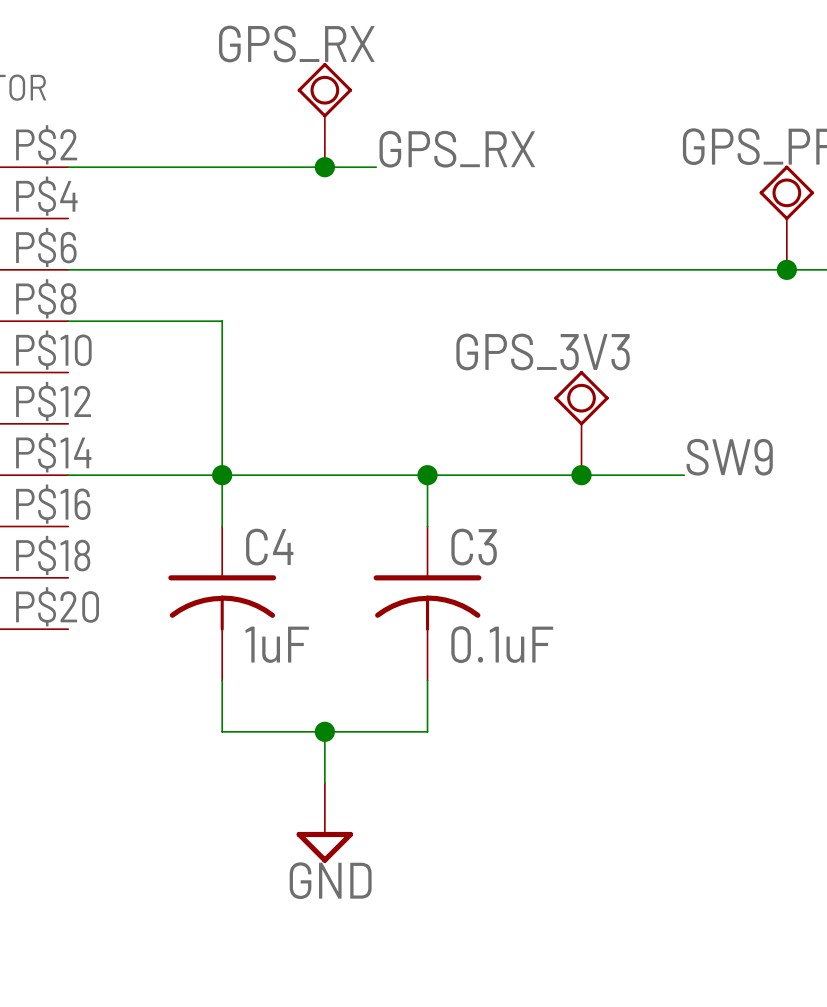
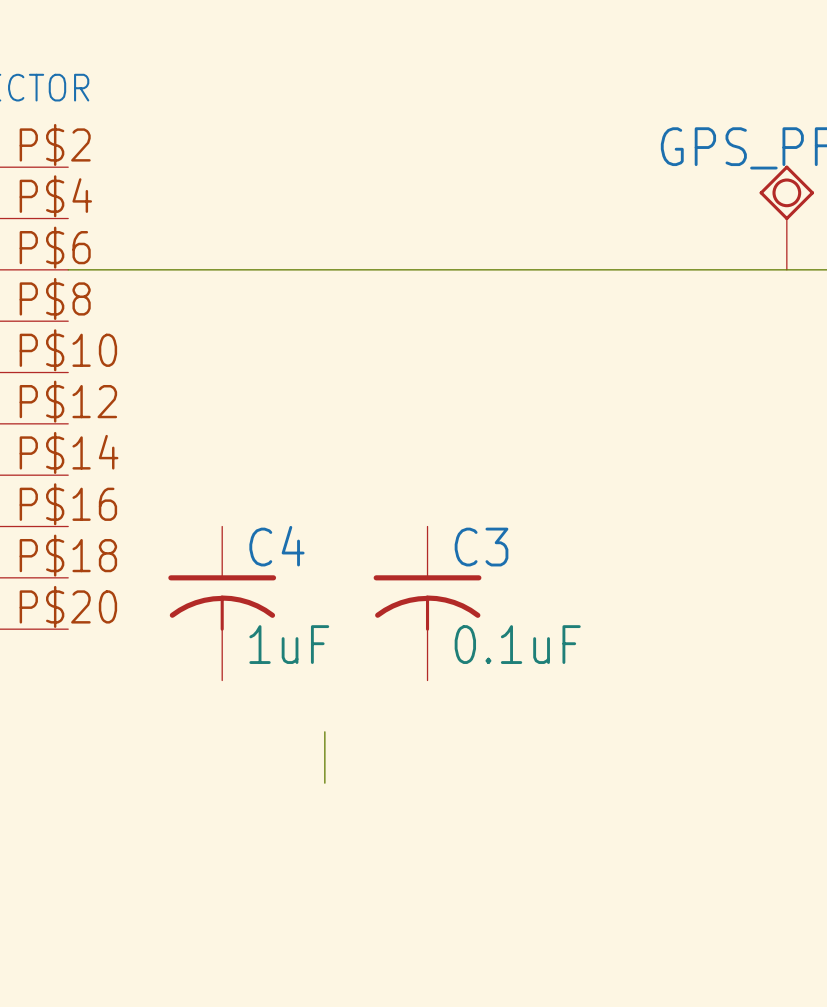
GPS_RX: (324, 115) -> none
label: GPS_RX (457, 149) -> none
wire: (68, 167) (376, 167) -> none
junction: (324, 167) -> none
junction: (786, 269) -> none
wire: (68, 321) (222, 321) (222, 526) -> none
GPS_3V3: (581, 423) -> none
label: SW9 (729, 457) -> none
wire: (68, 475) (684, 475) -> none
junction: (222, 475) -> none
wire: (427, 475) (427, 526) -> none
junction: (427, 475) -> none
junction: (581, 475) -> none
wire: (222, 680) (222, 731) (427, 731) (427, 680) -> none
junction: (324, 731) -> none
power symbol: GND (324, 822) -> none

